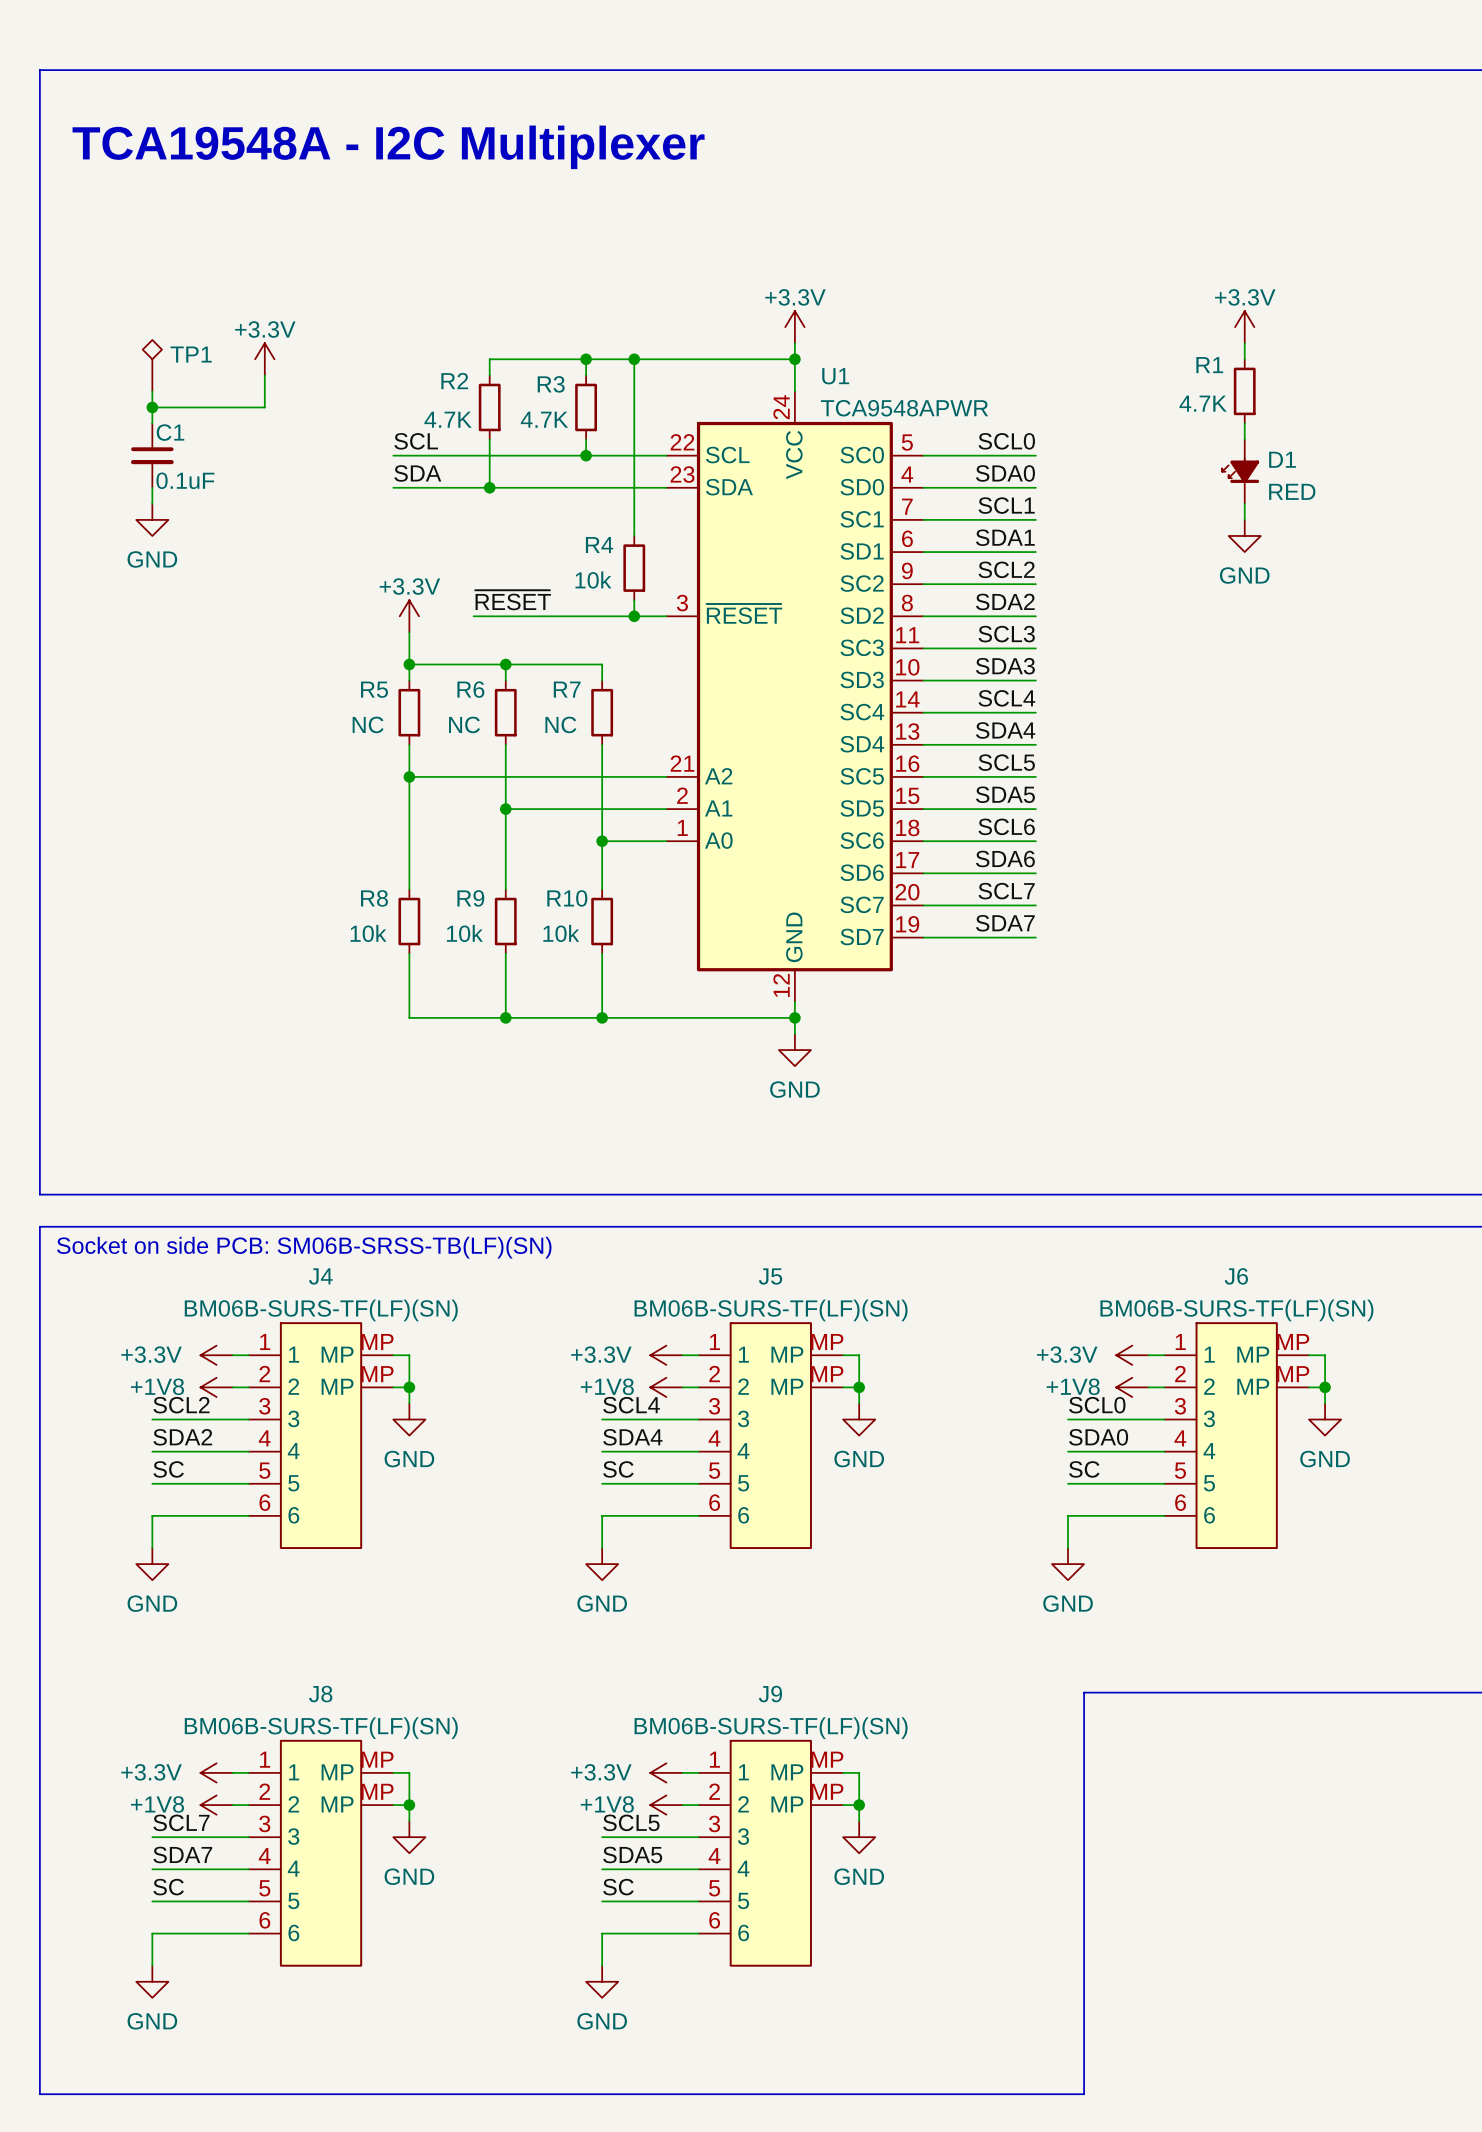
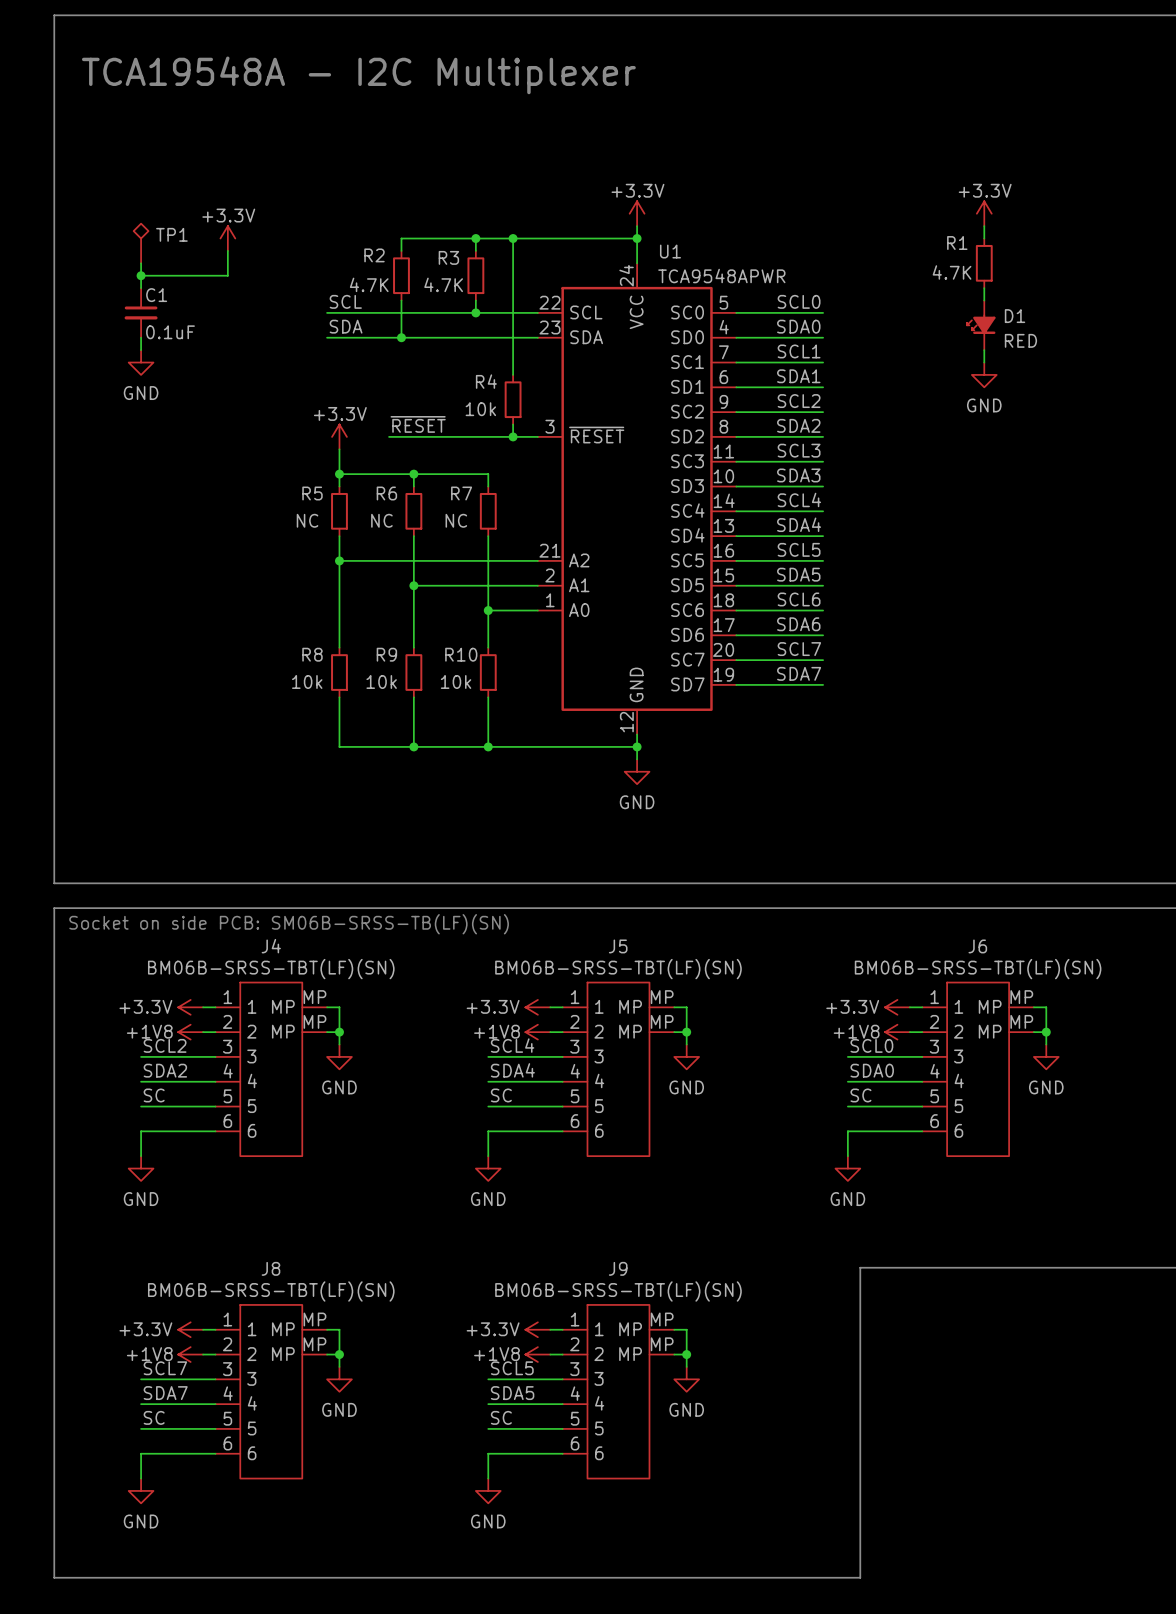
J4 value: BM06B-SURS-TF(LF)(SN) (321, 1310) -> BM06B-SRSS-TBT(LF)(SN) (271, 969)
J5 value: BM06B-SURS-TF(LF)(SN) (771, 1310) -> BM06B-SRSS-TBT(LF)(SN) (618, 969)
J6 value: BM06B-SURS-TF(LF)(SN) (1236, 1310) -> BM06B-SRSS-TBT(LF)(SN) (978, 969)
J8 value: BM06B-SURS-TF(LF)(SN) (321, 1728) -> BM06B-SRSS-TBT(LF)(SN) (271, 1291)
J9 value: BM06B-SURS-TF(LF)(SN) (771, 1728) -> BM06B-SRSS-TBT(LF)(SN) (618, 1291)

